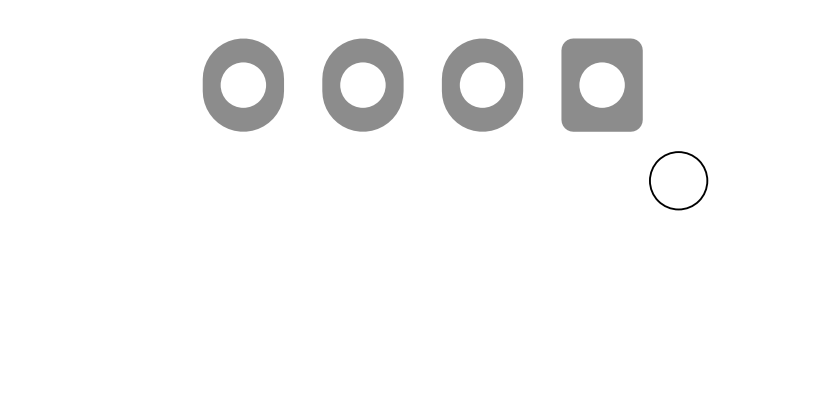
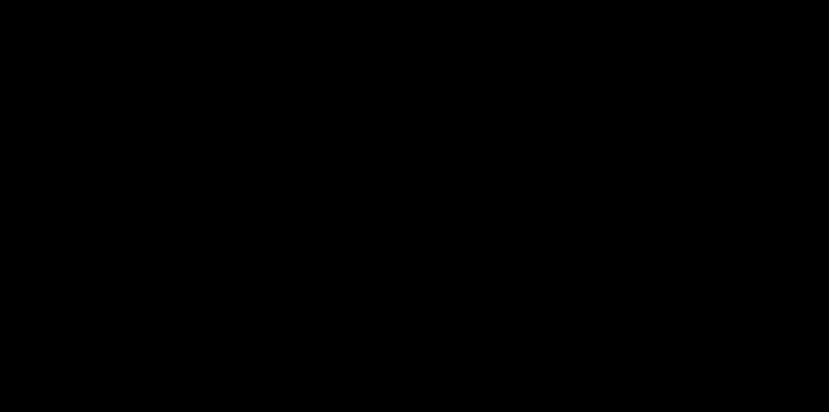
part: (455, 123) -> none

